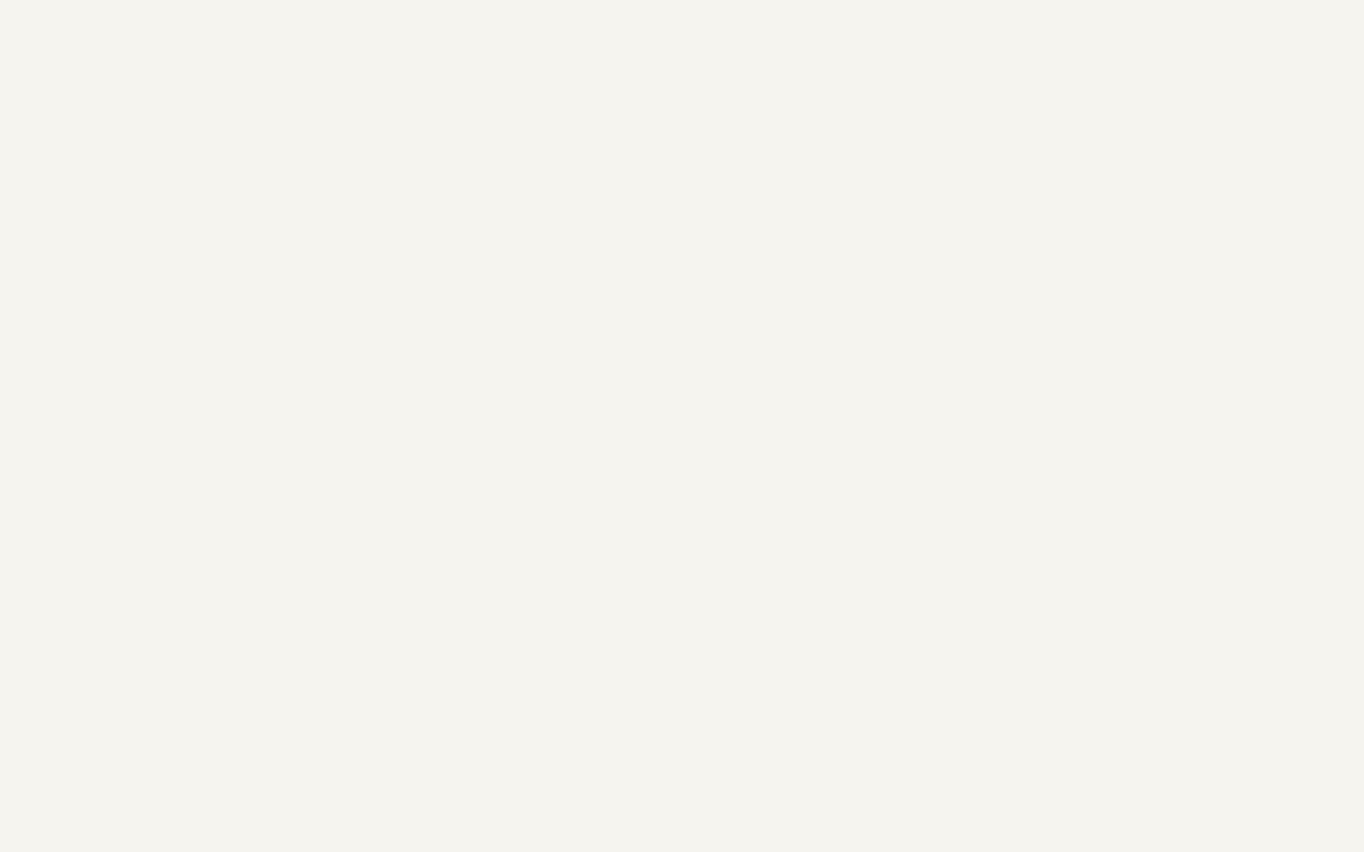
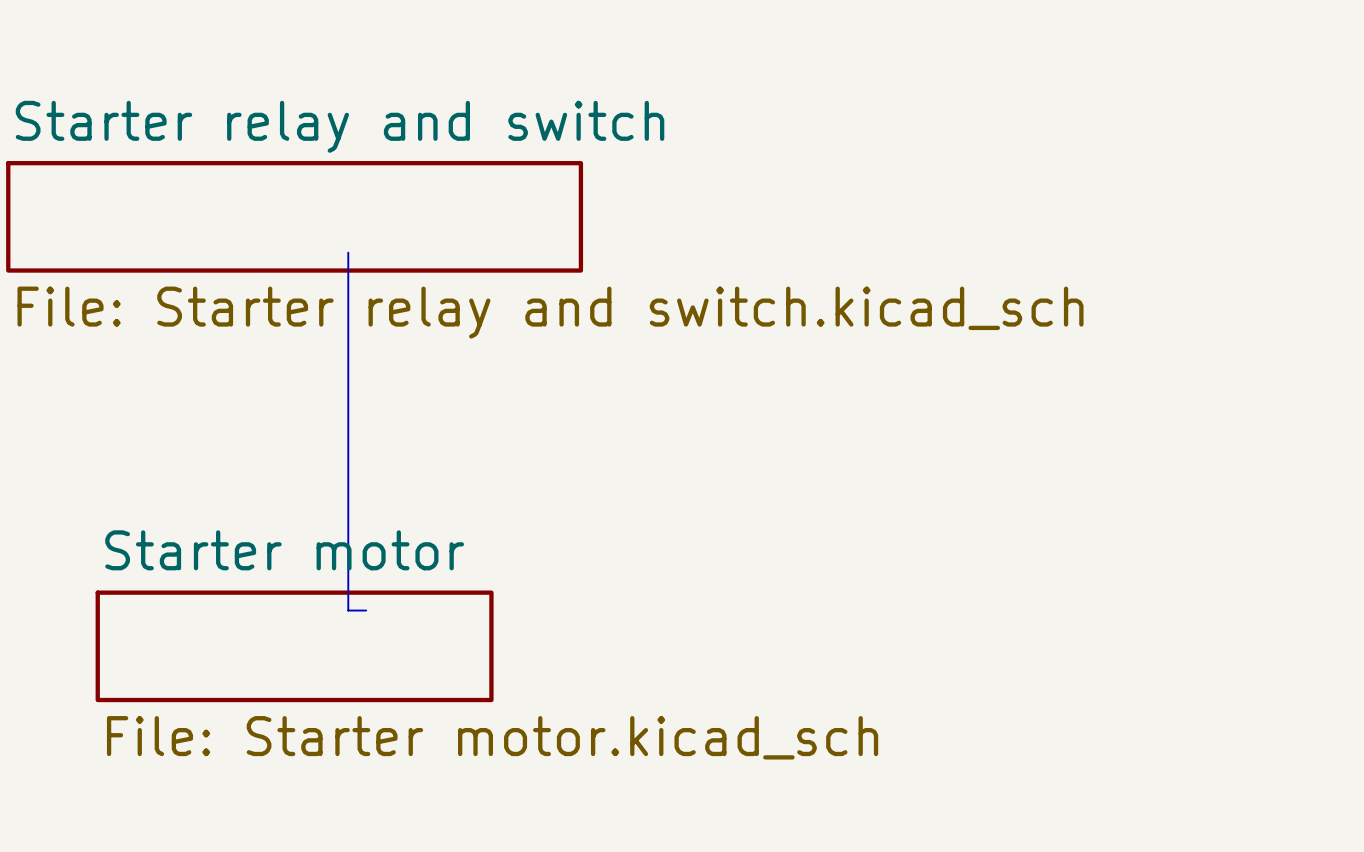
sheet Starter relay and switch: none -> File: Starter relay and switch.kicad_sch (294, 216)
bus: none -> (348, 252) (348, 610) (366, 610)
sheet Starter motor: none -> File: Starter motor.kicad_sch (294, 646)

